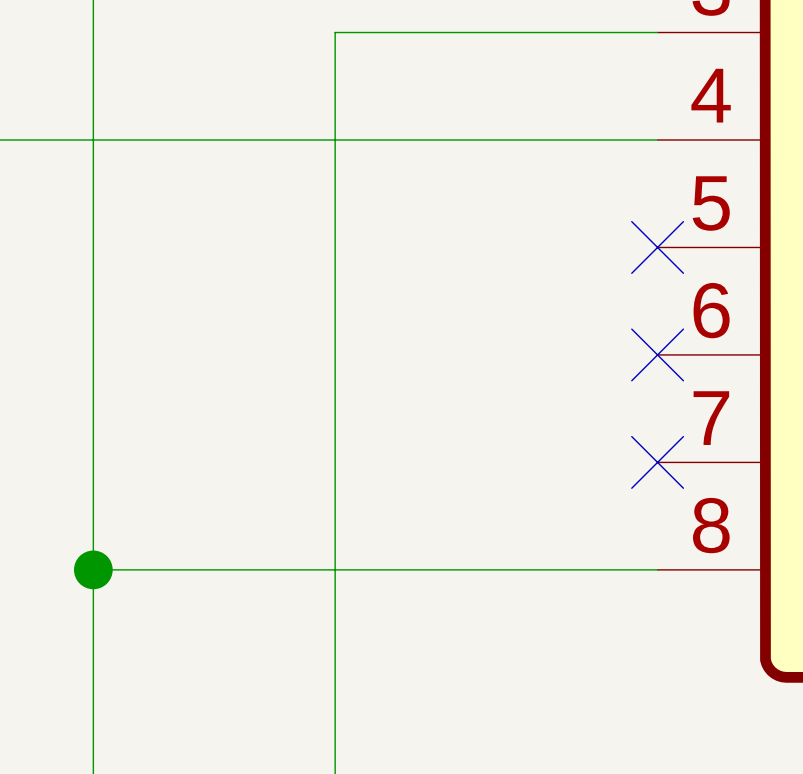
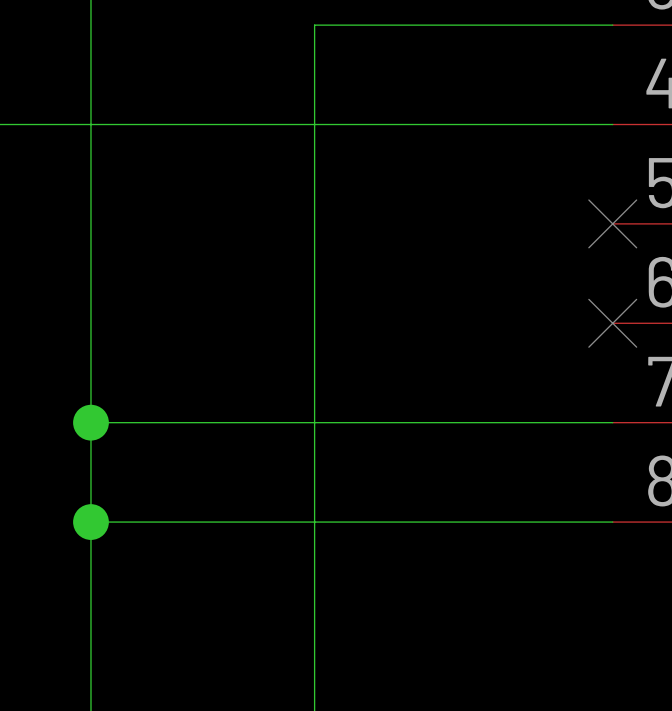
wire: none -> (90, 422) (612, 422)
junction: none -> (90, 422)
no-connect mark: (657, 462) -> none

